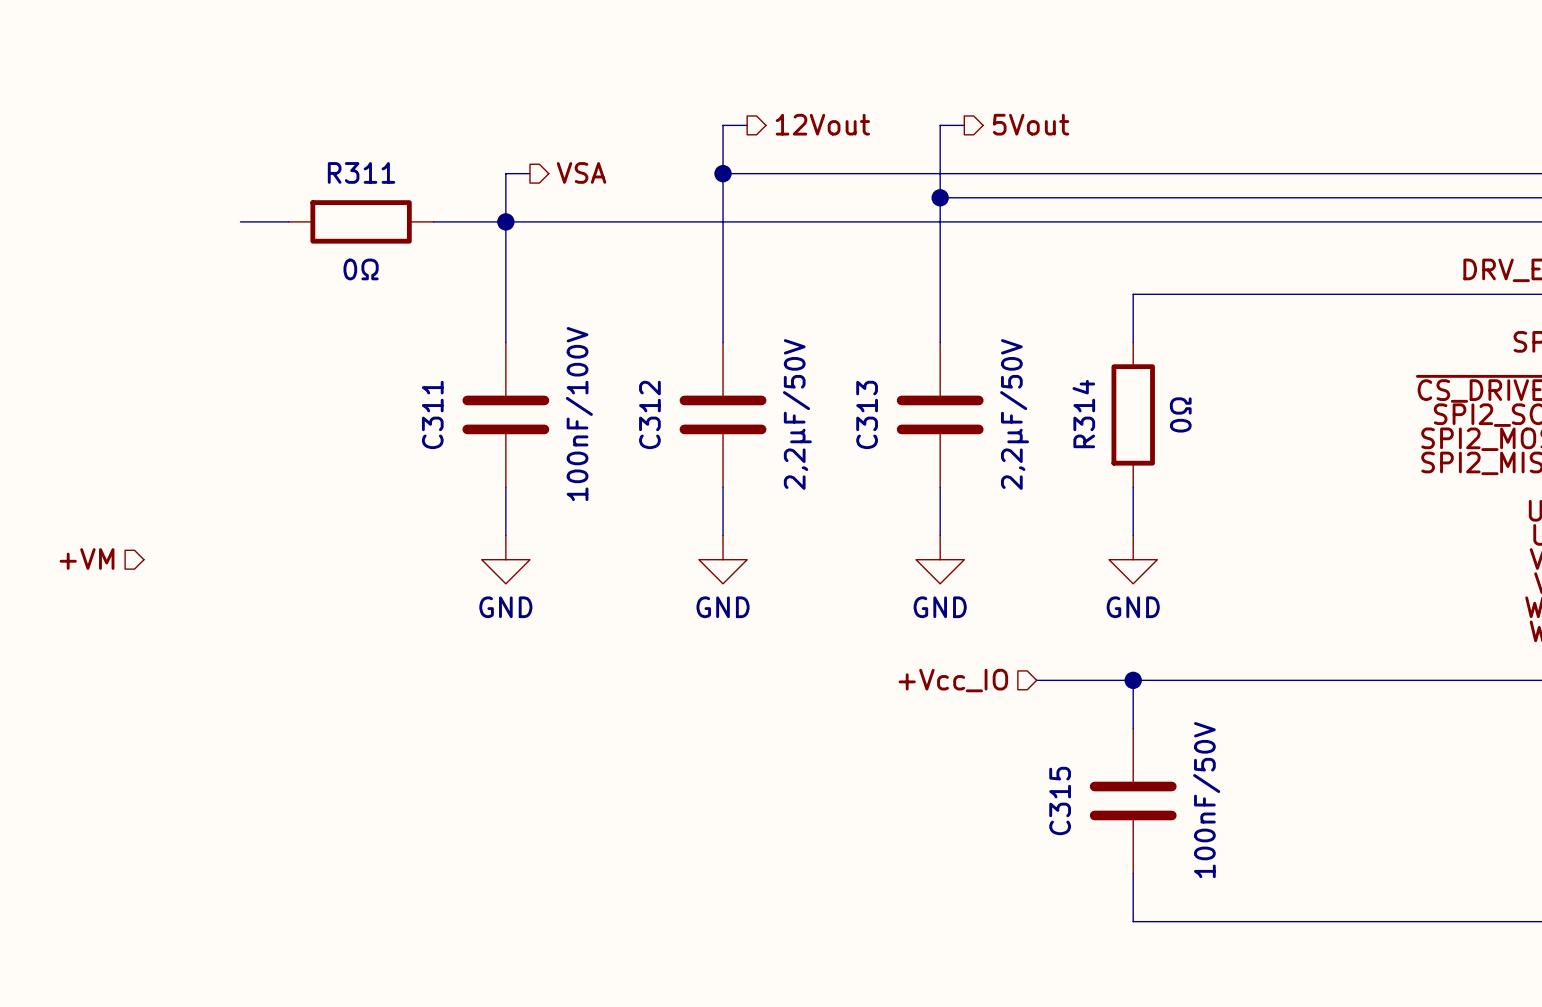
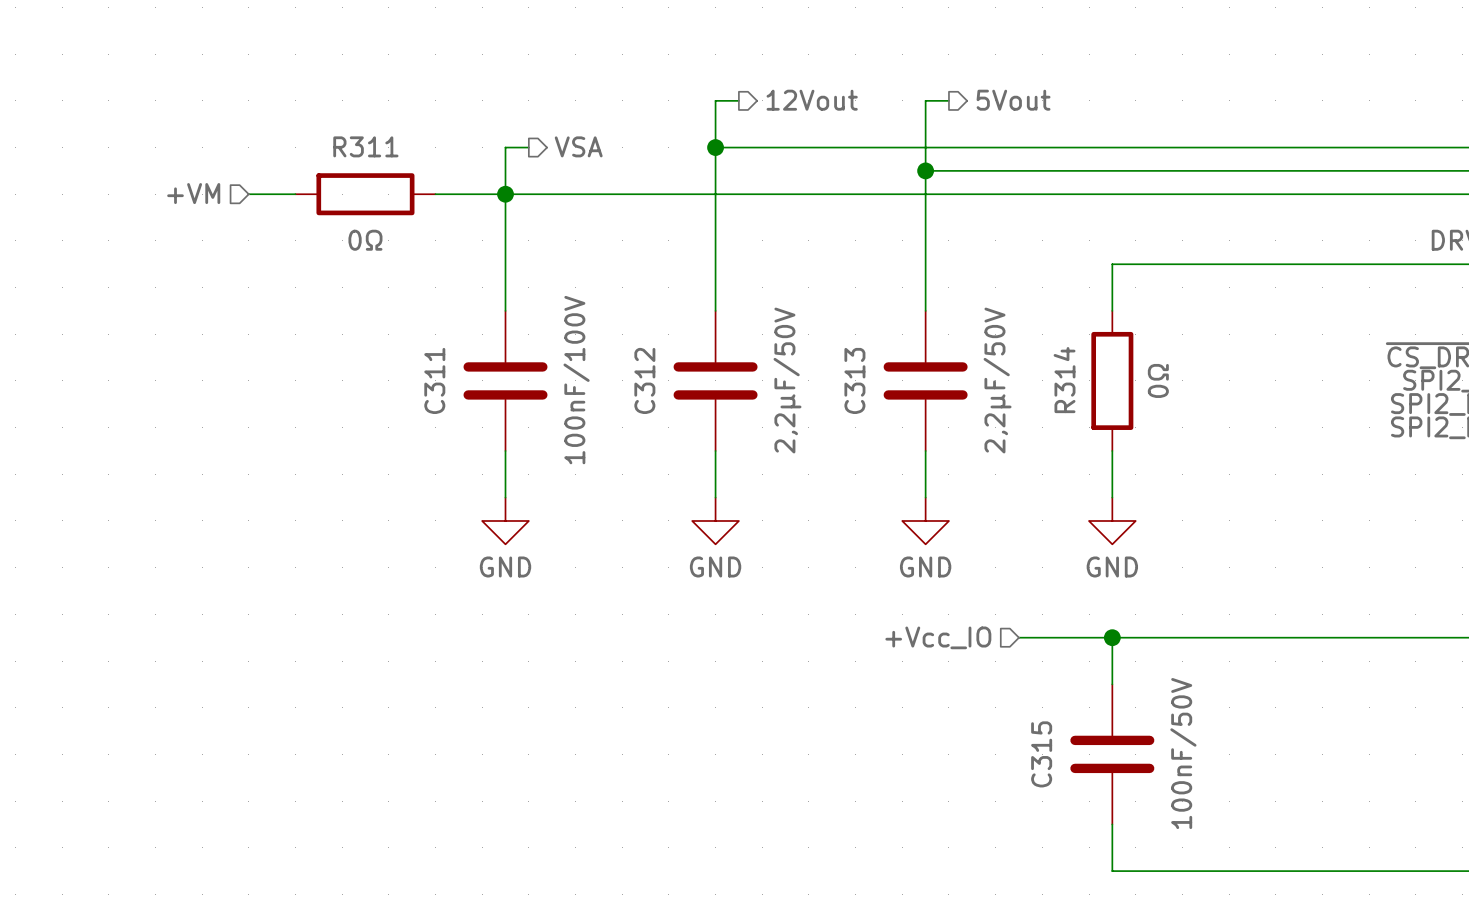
hierarchical label position: +VM (87, 559) -> +VM (193, 193)

